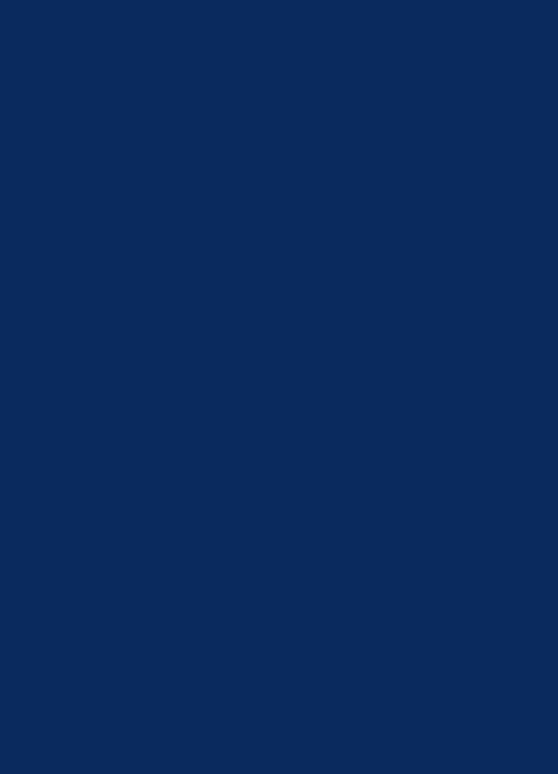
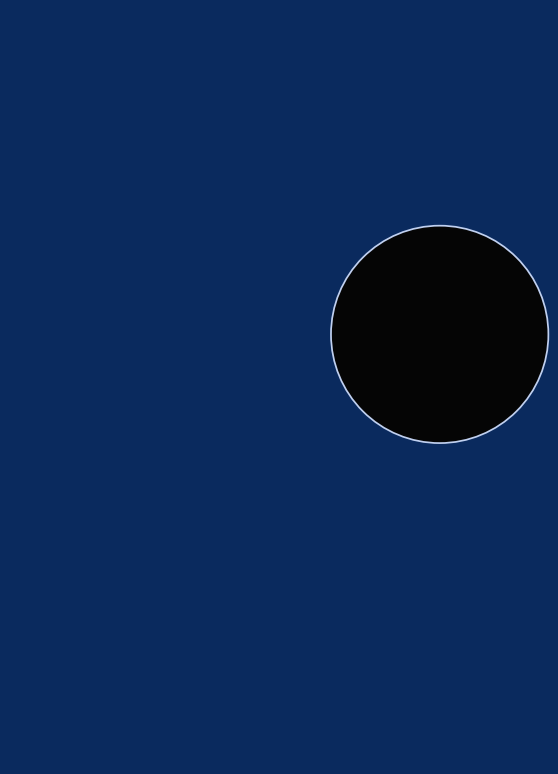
part: none -> (439, 334)

